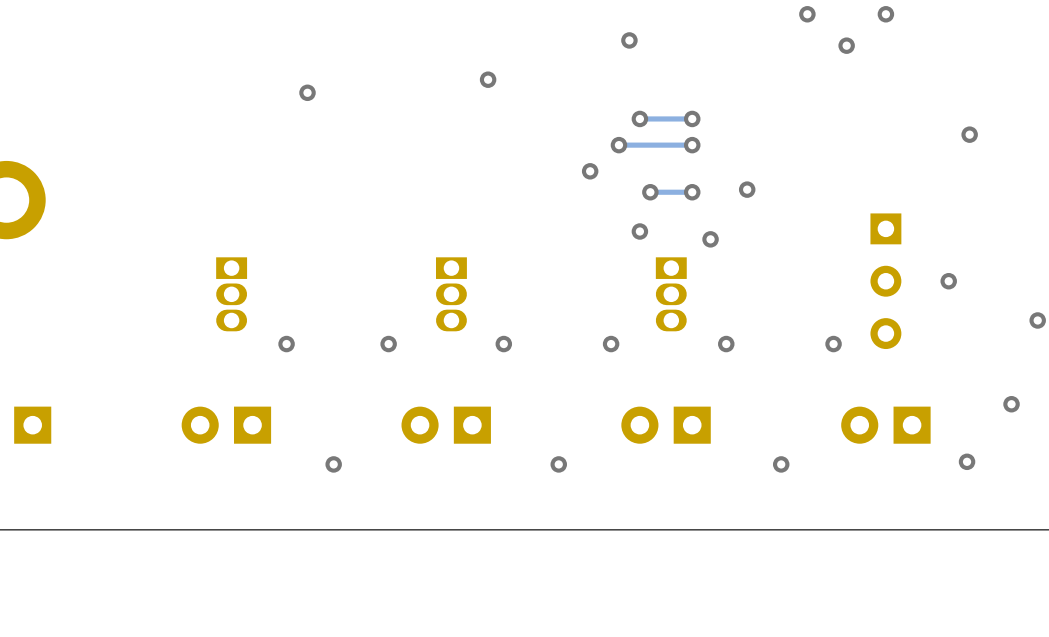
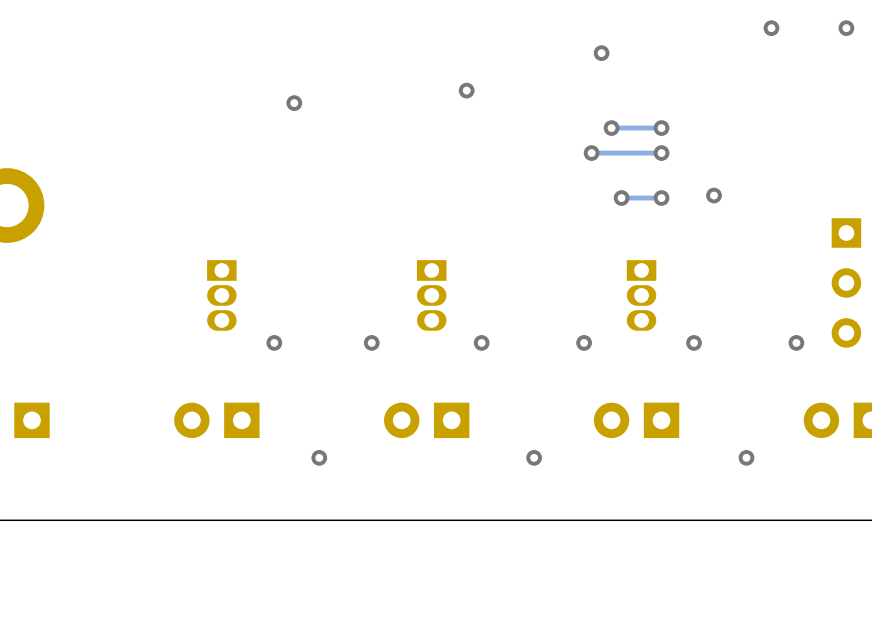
via: (846, 45) -> none
via: (590, 171) -> none
via: (639, 231) -> none
via: (710, 239) -> none

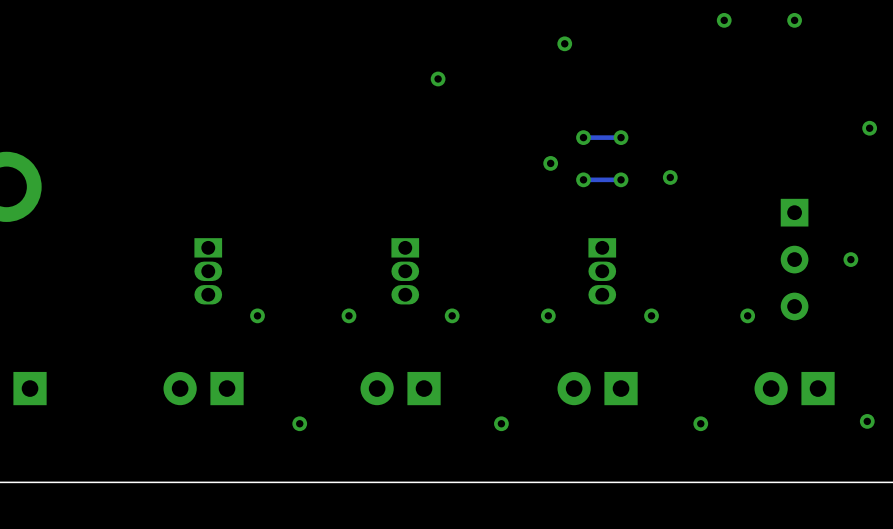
via: (294, 103) -> none
via: (611, 128) -> none
track: (661, 128) (611, 128) -> none
via: (661, 128) -> none
via: (591, 153) -> none
track: (621, 153) (591, 153) -> none
via: none -> (583, 137)
via: none -> (550, 163)

